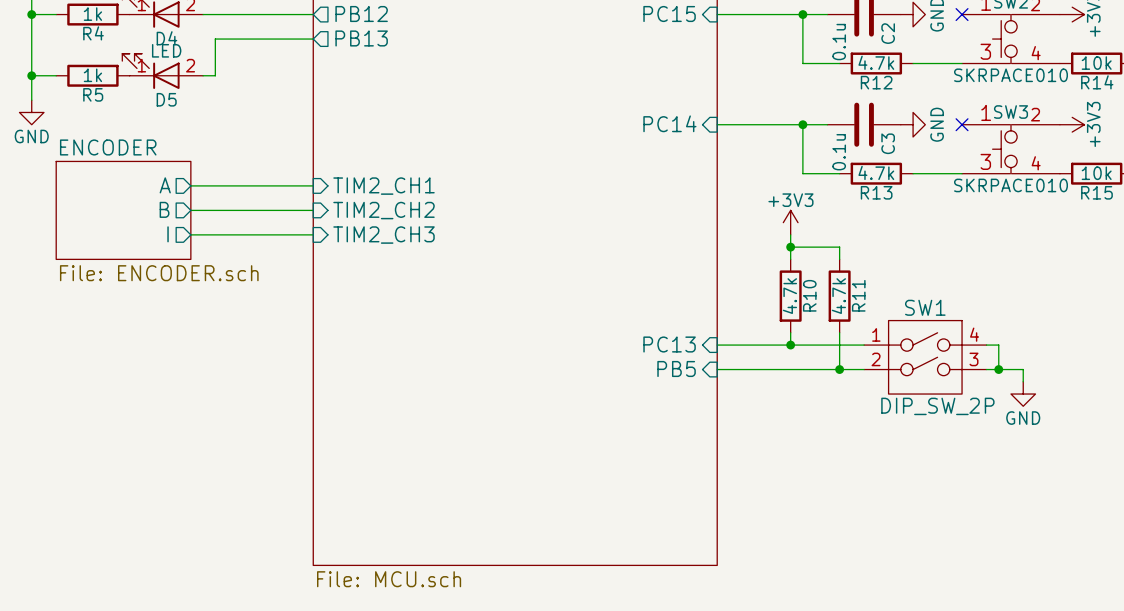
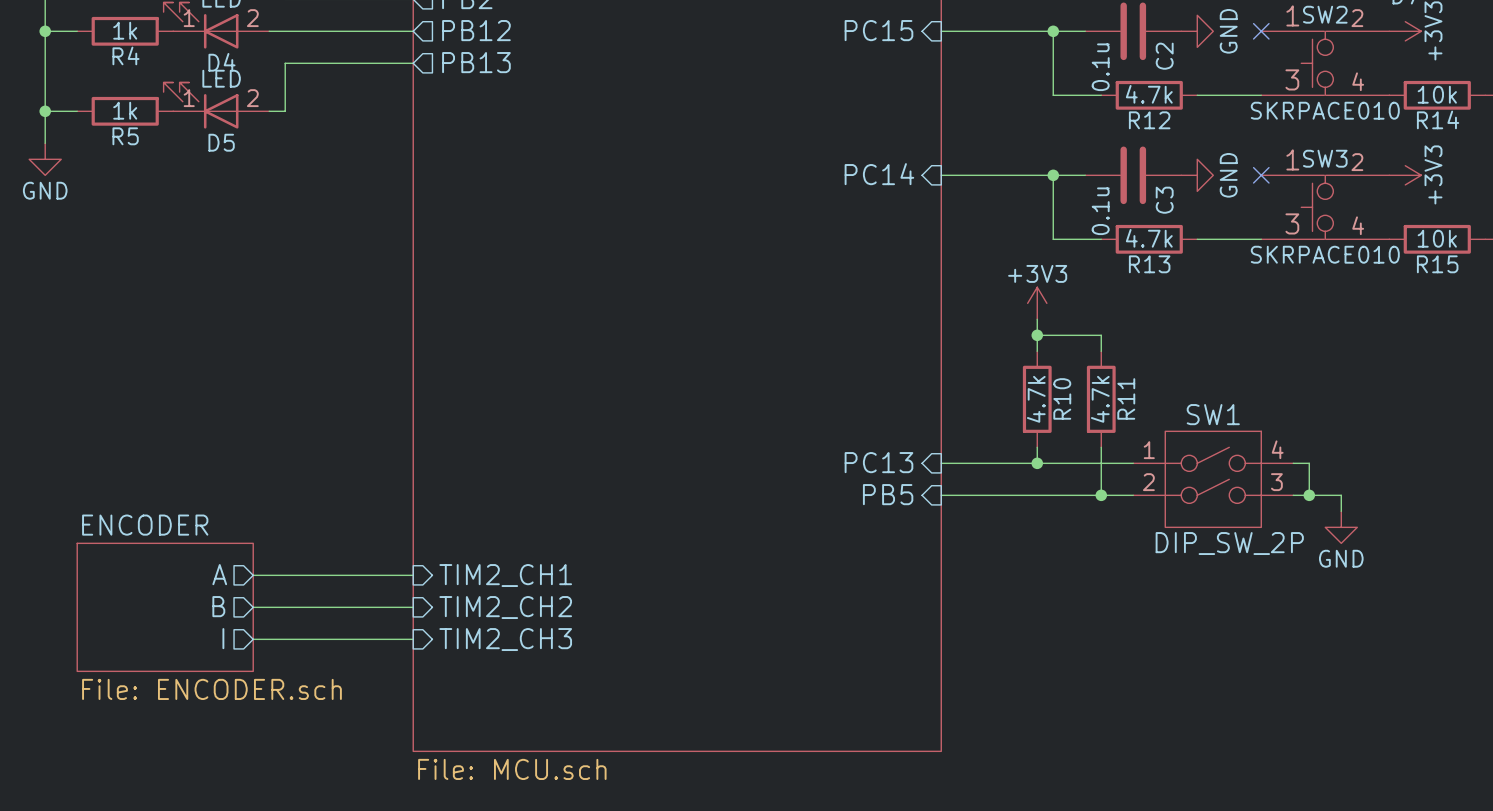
sheet pin: A (165, 185) -> none
wire: (190, 185) (313, 185) -> none
sheet pin: TIM2_CH1 (384, 186) -> none
sheet pin: B (164, 209) -> none
sheet ENCODER: File: ENCODER.sch (123, 210) -> none
wire: (190, 210) (313, 210) -> (253, 575) (413, 575)
sheet pin: TIM2_CH2 (384, 210) -> none
sheet pin: I (168, 234) -> none
wire: (190, 234) (313, 234) -> (253, 607) (413, 607)
sheet pin: TIM2_CH3 (384, 235) -> none
sheet pin: none -> A (219, 574)
sheet pin: none -> TIM2_CH1 (505, 575)
sheet pin: none -> B (218, 606)
sheet ENCODER: none -> File: ENCODER.sch (165, 607)
sheet pin: none -> TIM2_CH2 (505, 607)
sheet pin: none -> I (223, 638)
wire: none -> (253, 639) (413, 639)
sheet pin: none -> TIM2_CH3 (505, 639)

